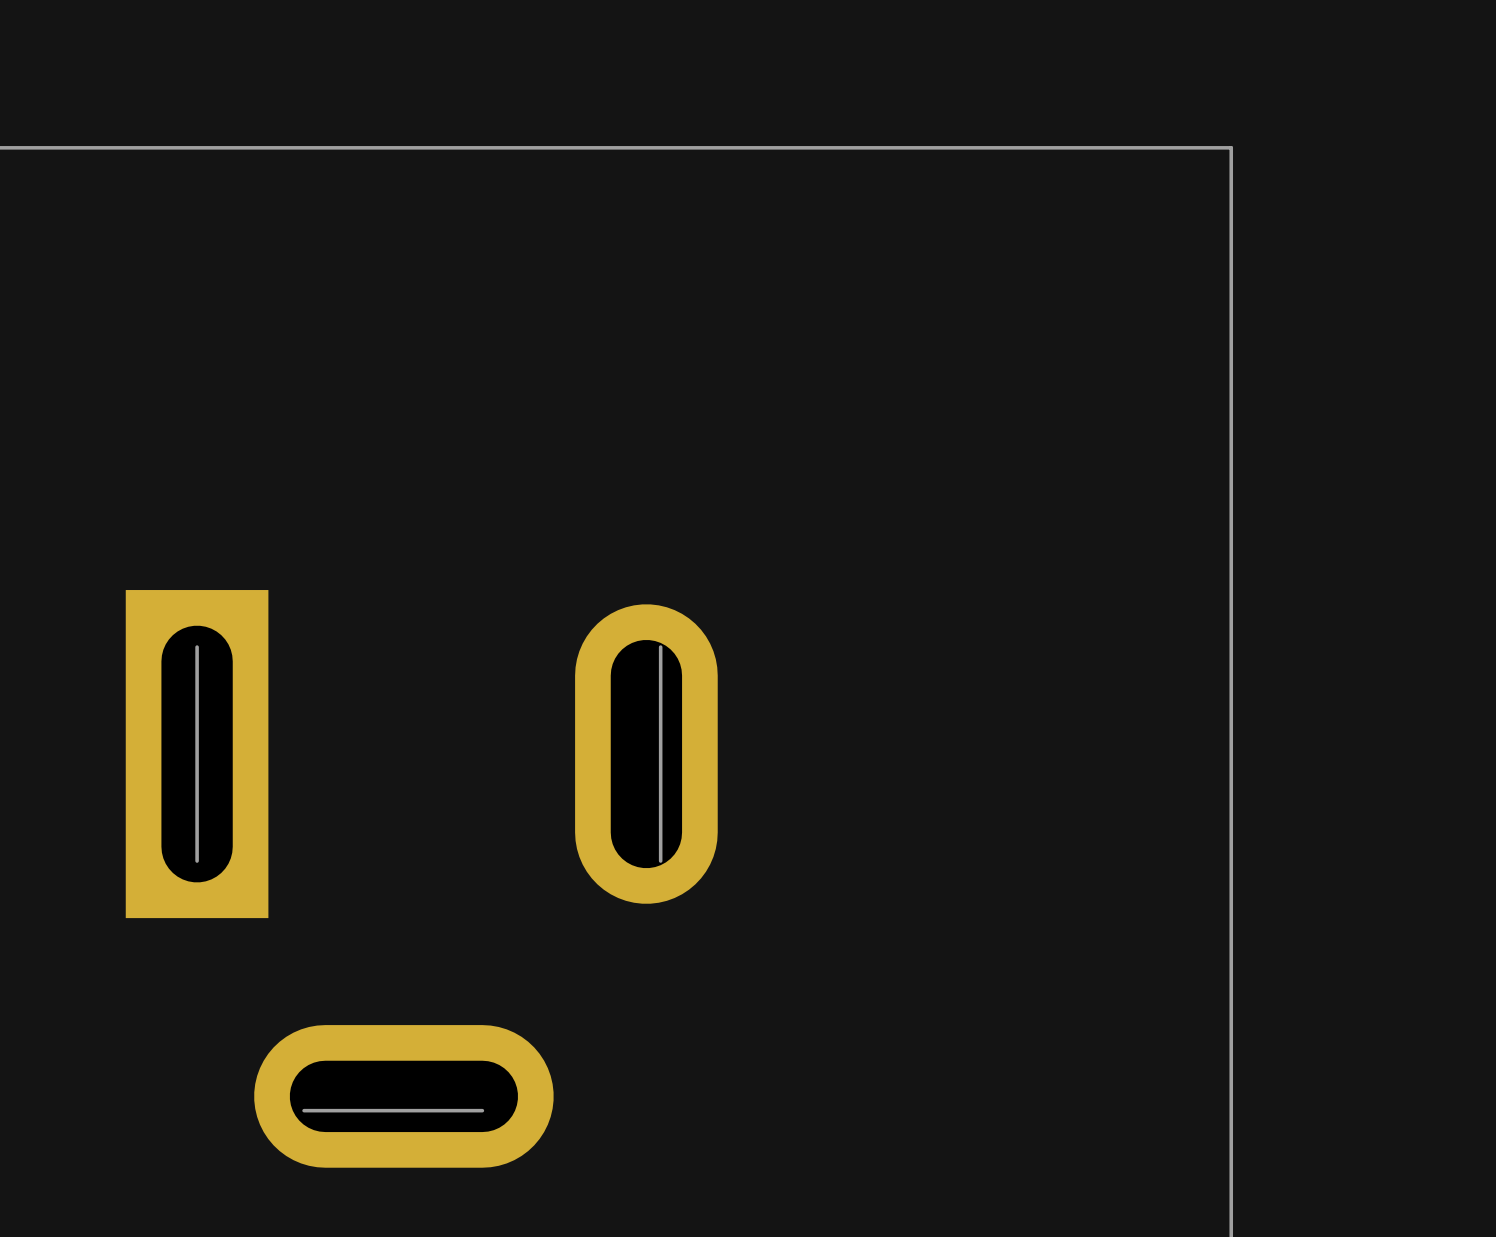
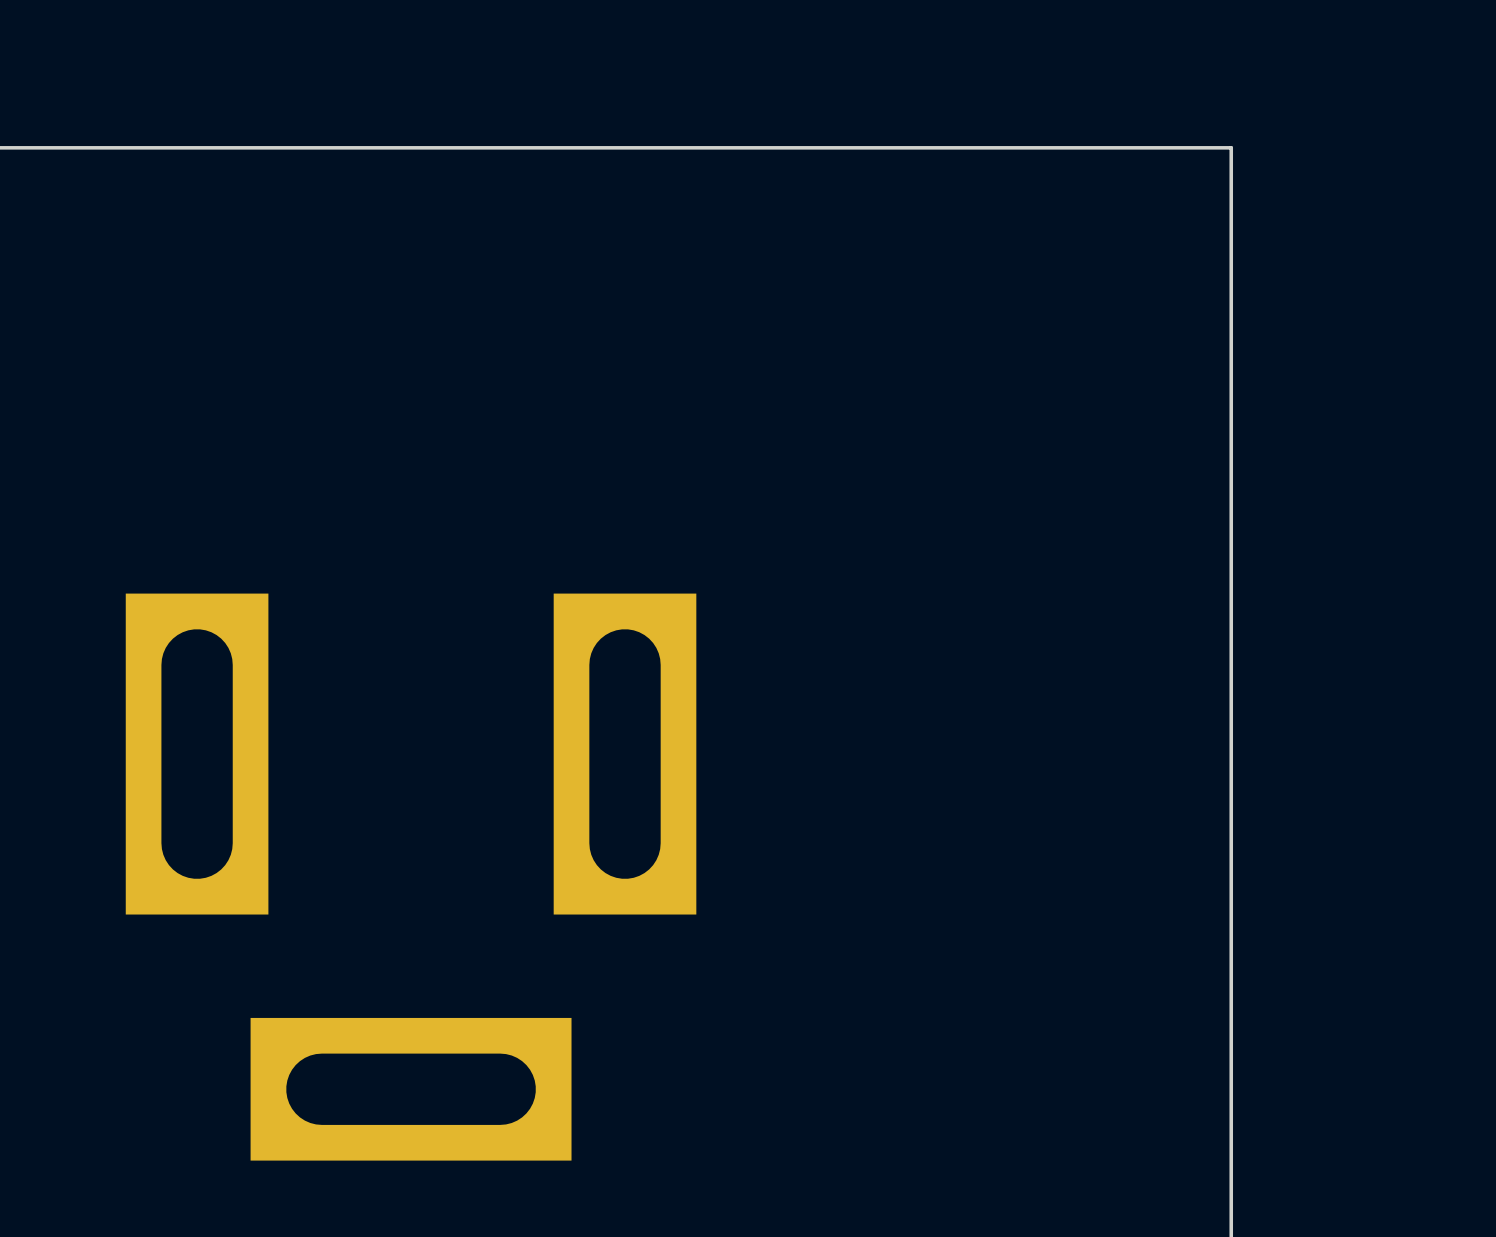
part footprint: [125, 590, 718, 1168] -> [125, 593, 697, 1161]
board edge: (197, 647) (197, 861) -> none
board edge: (660, 647) (660, 861) -> none
board edge: (482, 1110) (304, 1110) -> none

